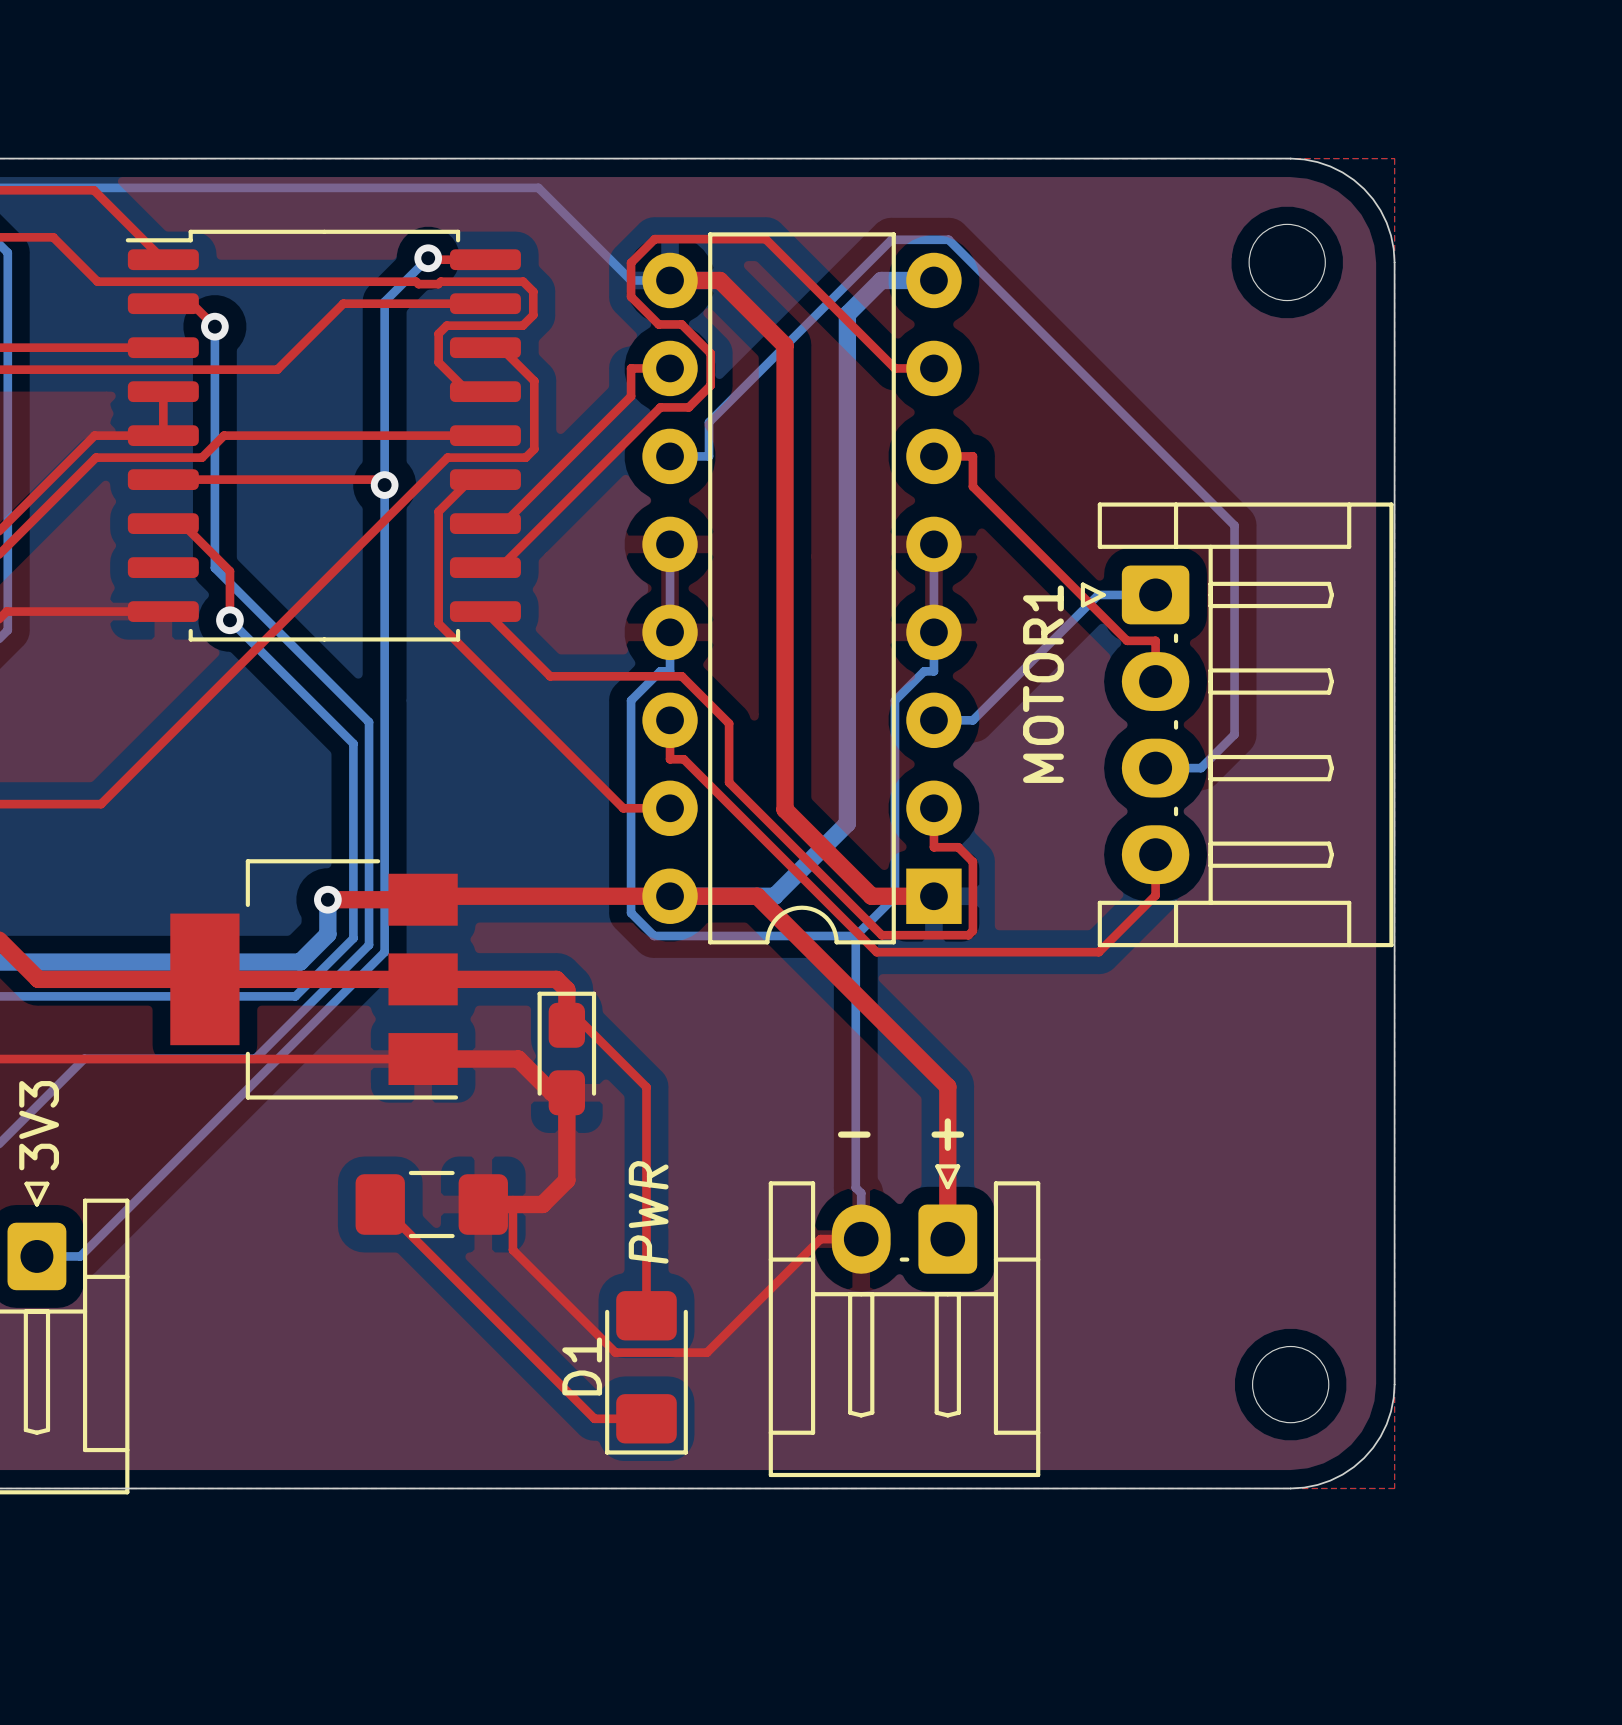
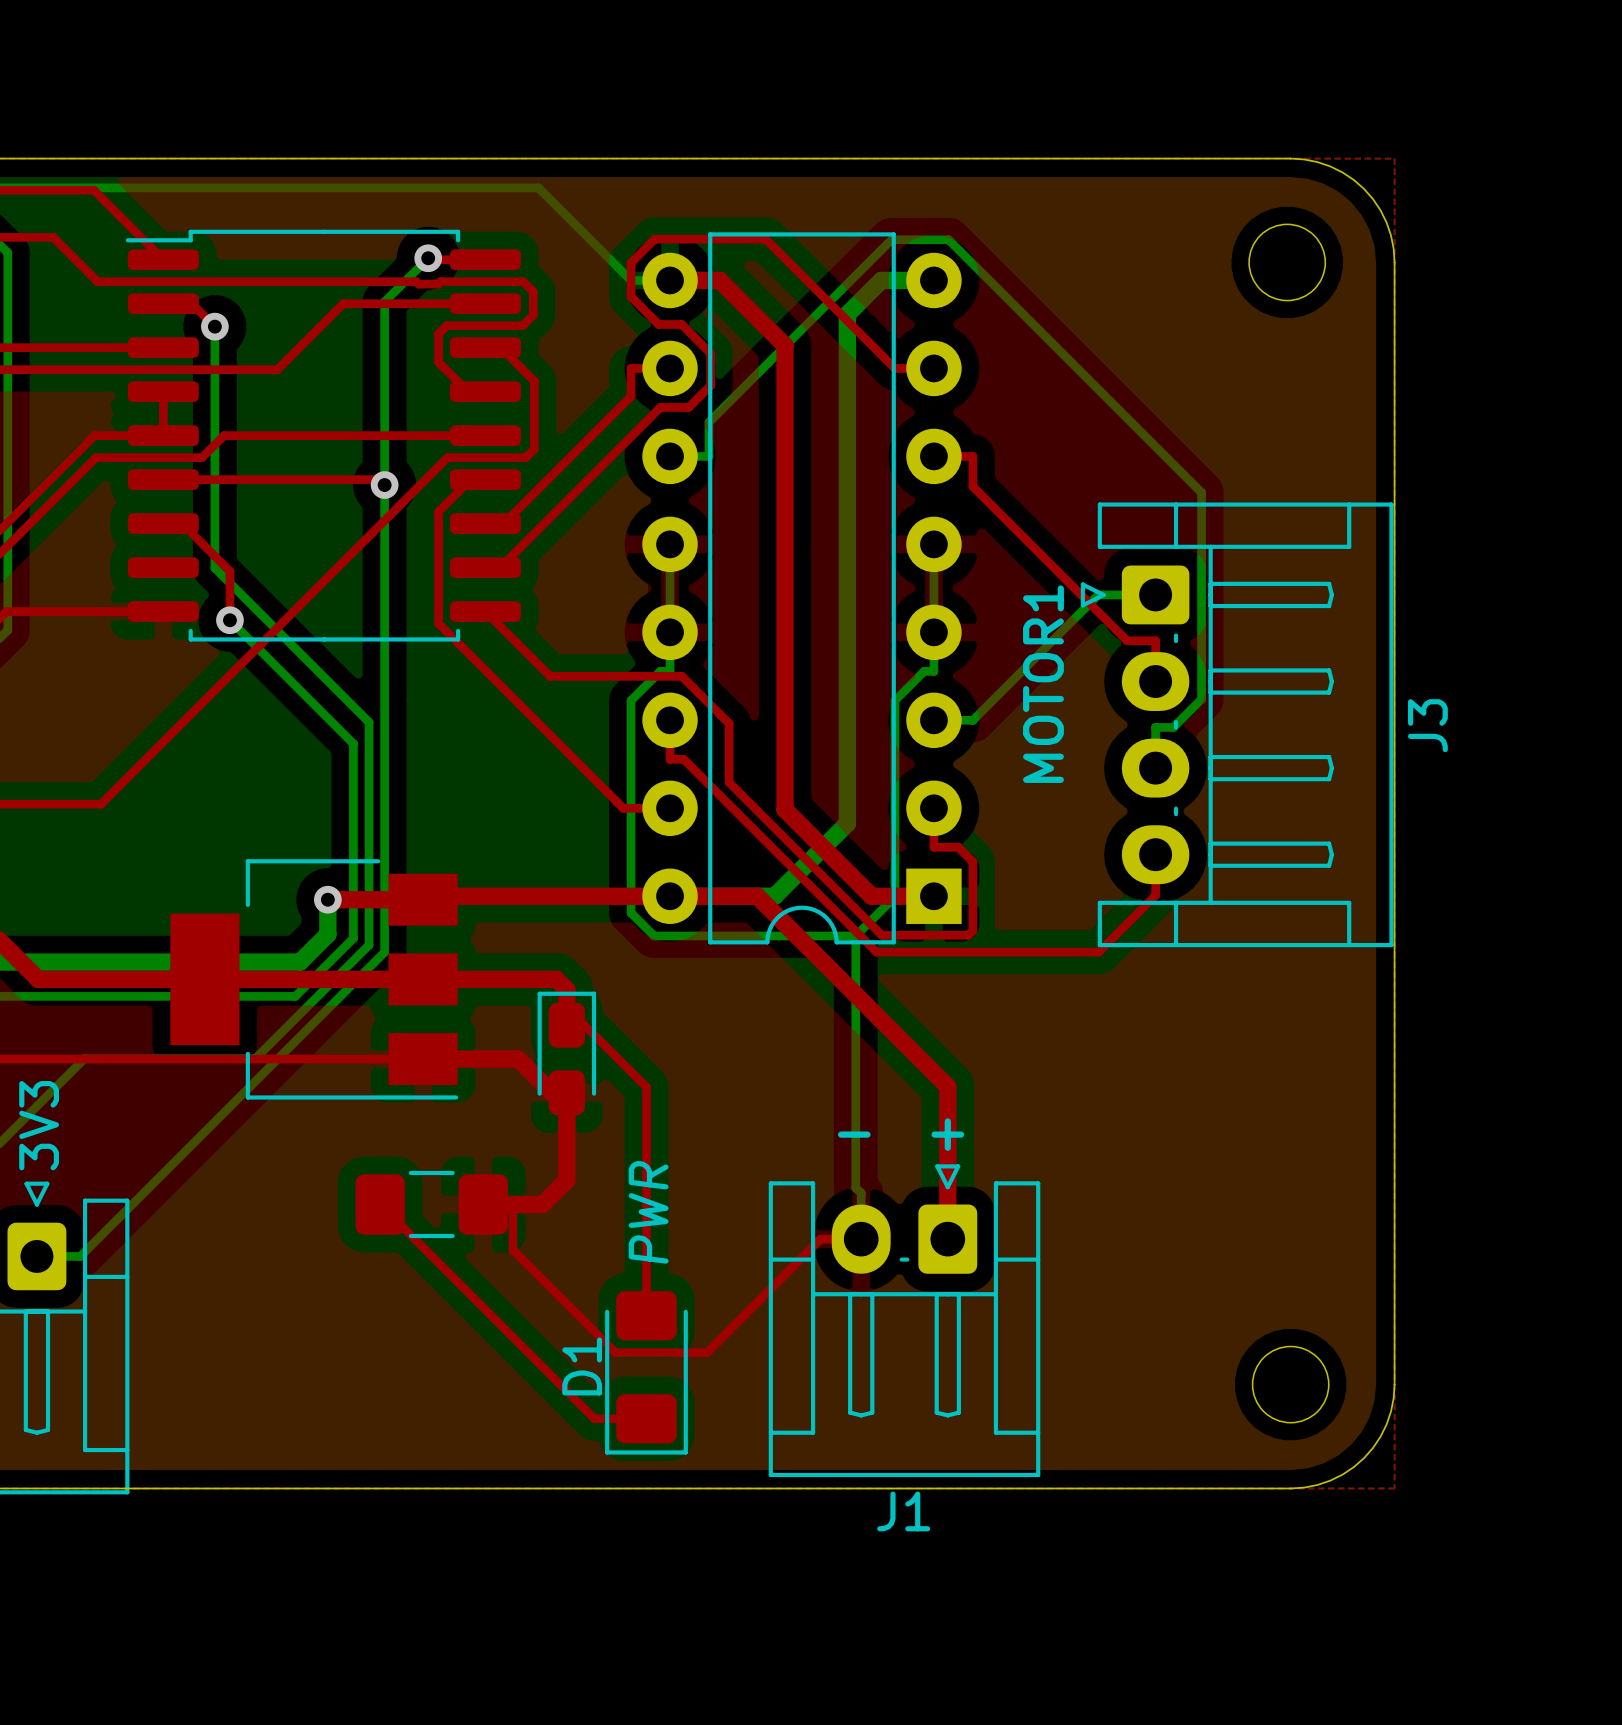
bottom track: (1201, 492) (1234, 525) (1234, 734) (1200, 768) (1155, 768) -> (1201, 492) (1201, 699) (1173, 727) (1155, 727) (1155, 768)
J3 name: none -> J3 (1427, 725)
J1 name: none -> J1 (903, 1511)

